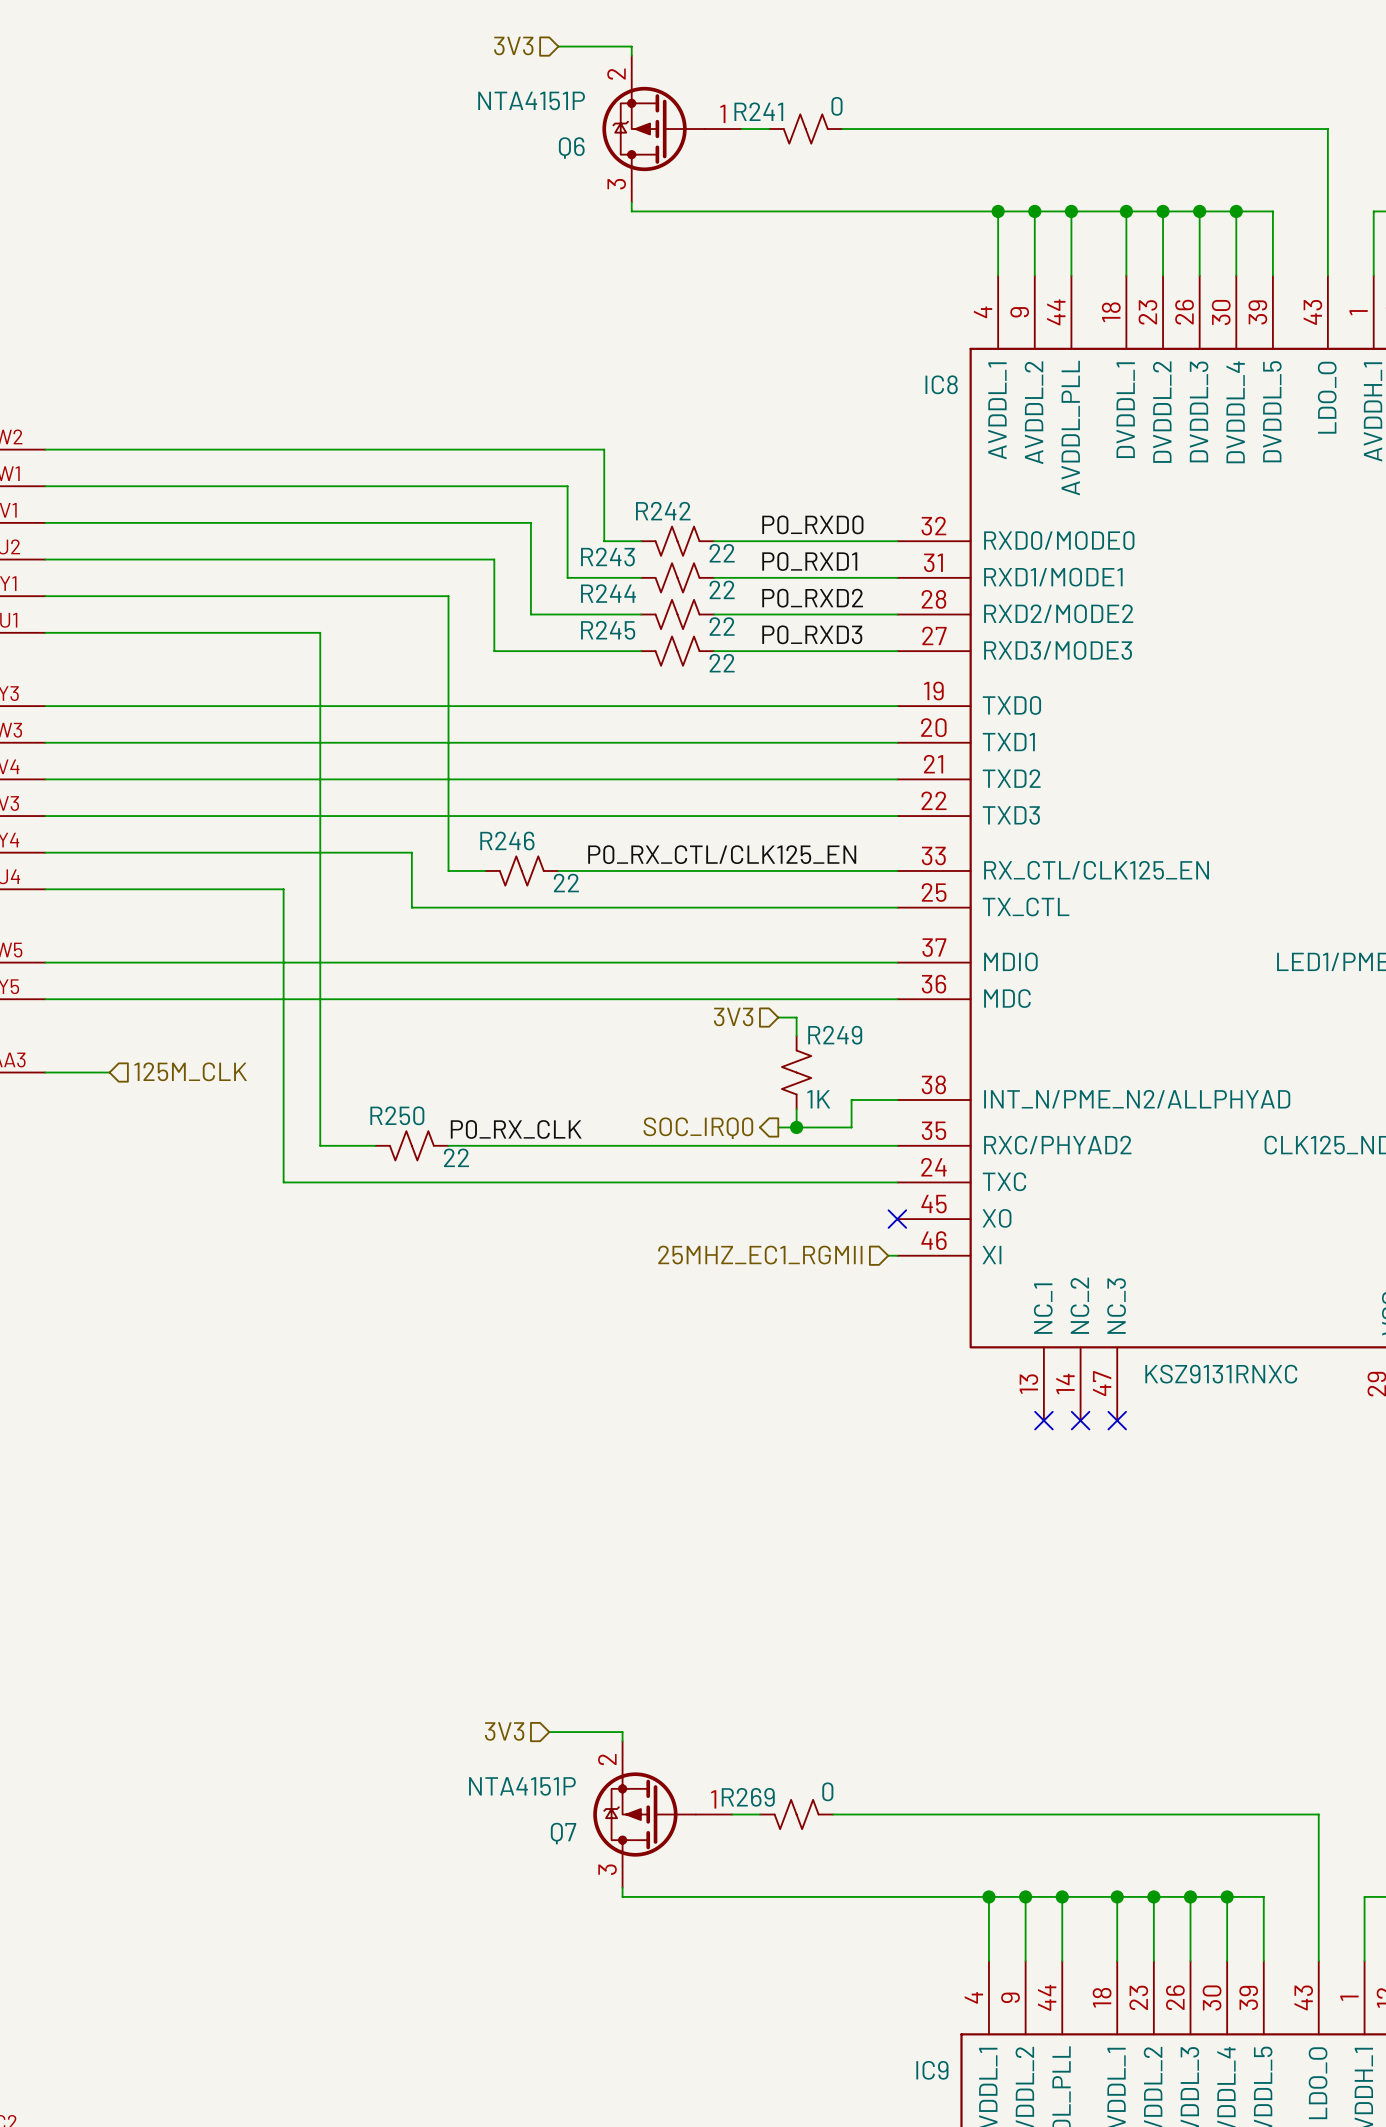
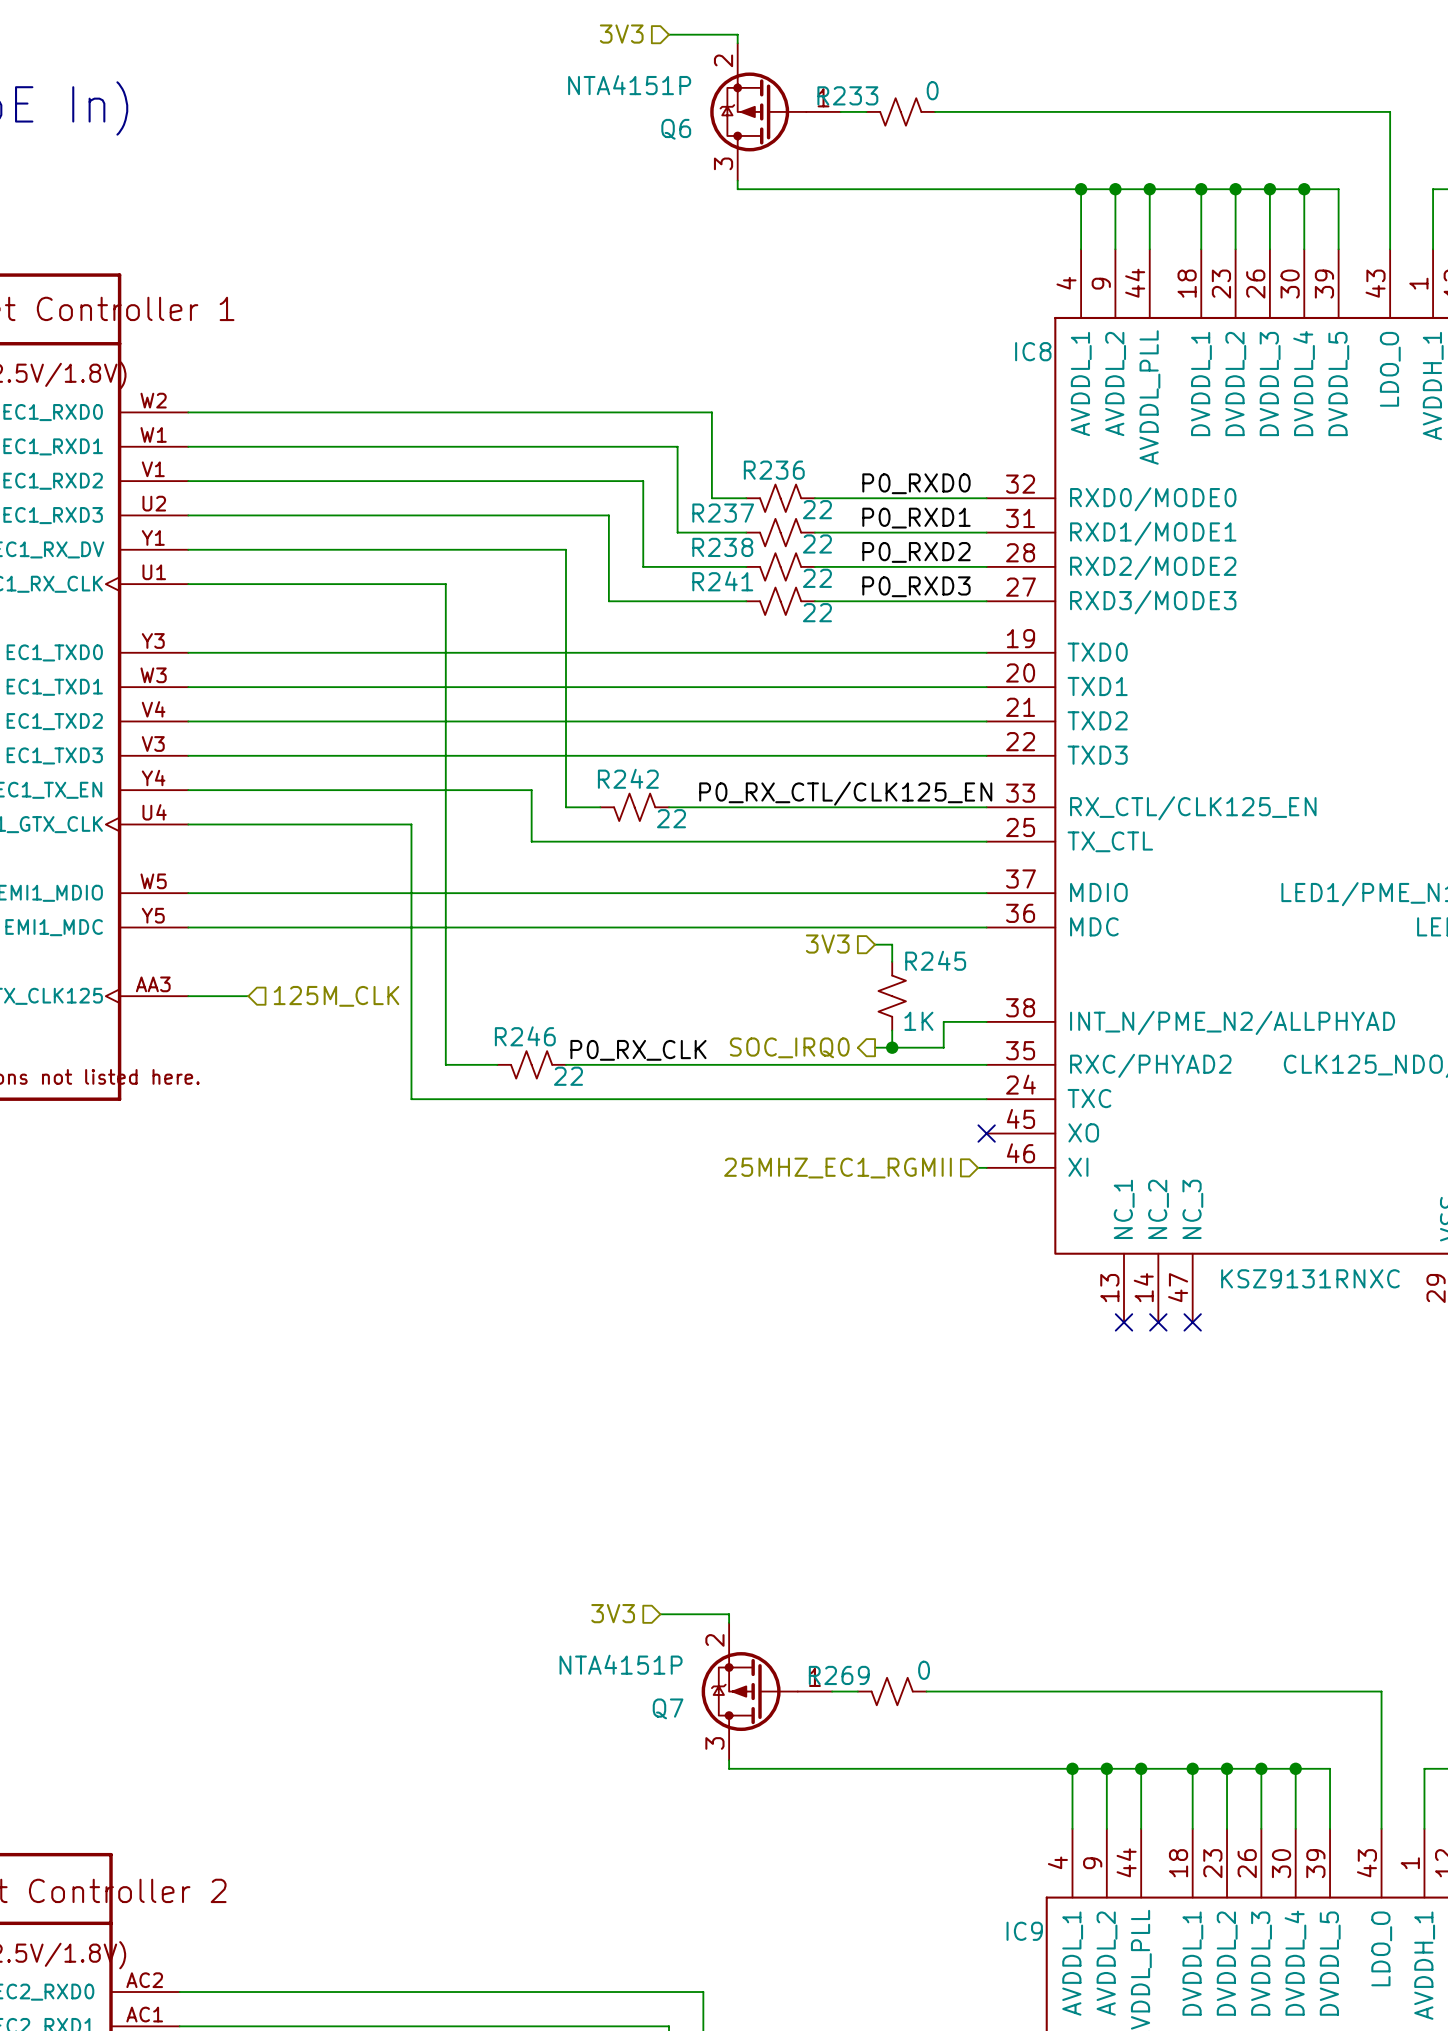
R241 name: R241 (758, 111) -> R233 (847, 95)
R242 name: R242 (663, 511) -> R236 (774, 470)
R243 name: R243 (607, 557) -> R237 (723, 513)
R244 name: R244 (608, 593) -> R238 (722, 547)
R245 name: R245 (608, 630) -> R241 (722, 581)
R246 name: R246 (507, 840) -> R242 (628, 778)
R249 name: R249 (835, 1035) -> R245 (935, 960)
R250 name: R250 (397, 1115) -> R246 (525, 1036)

